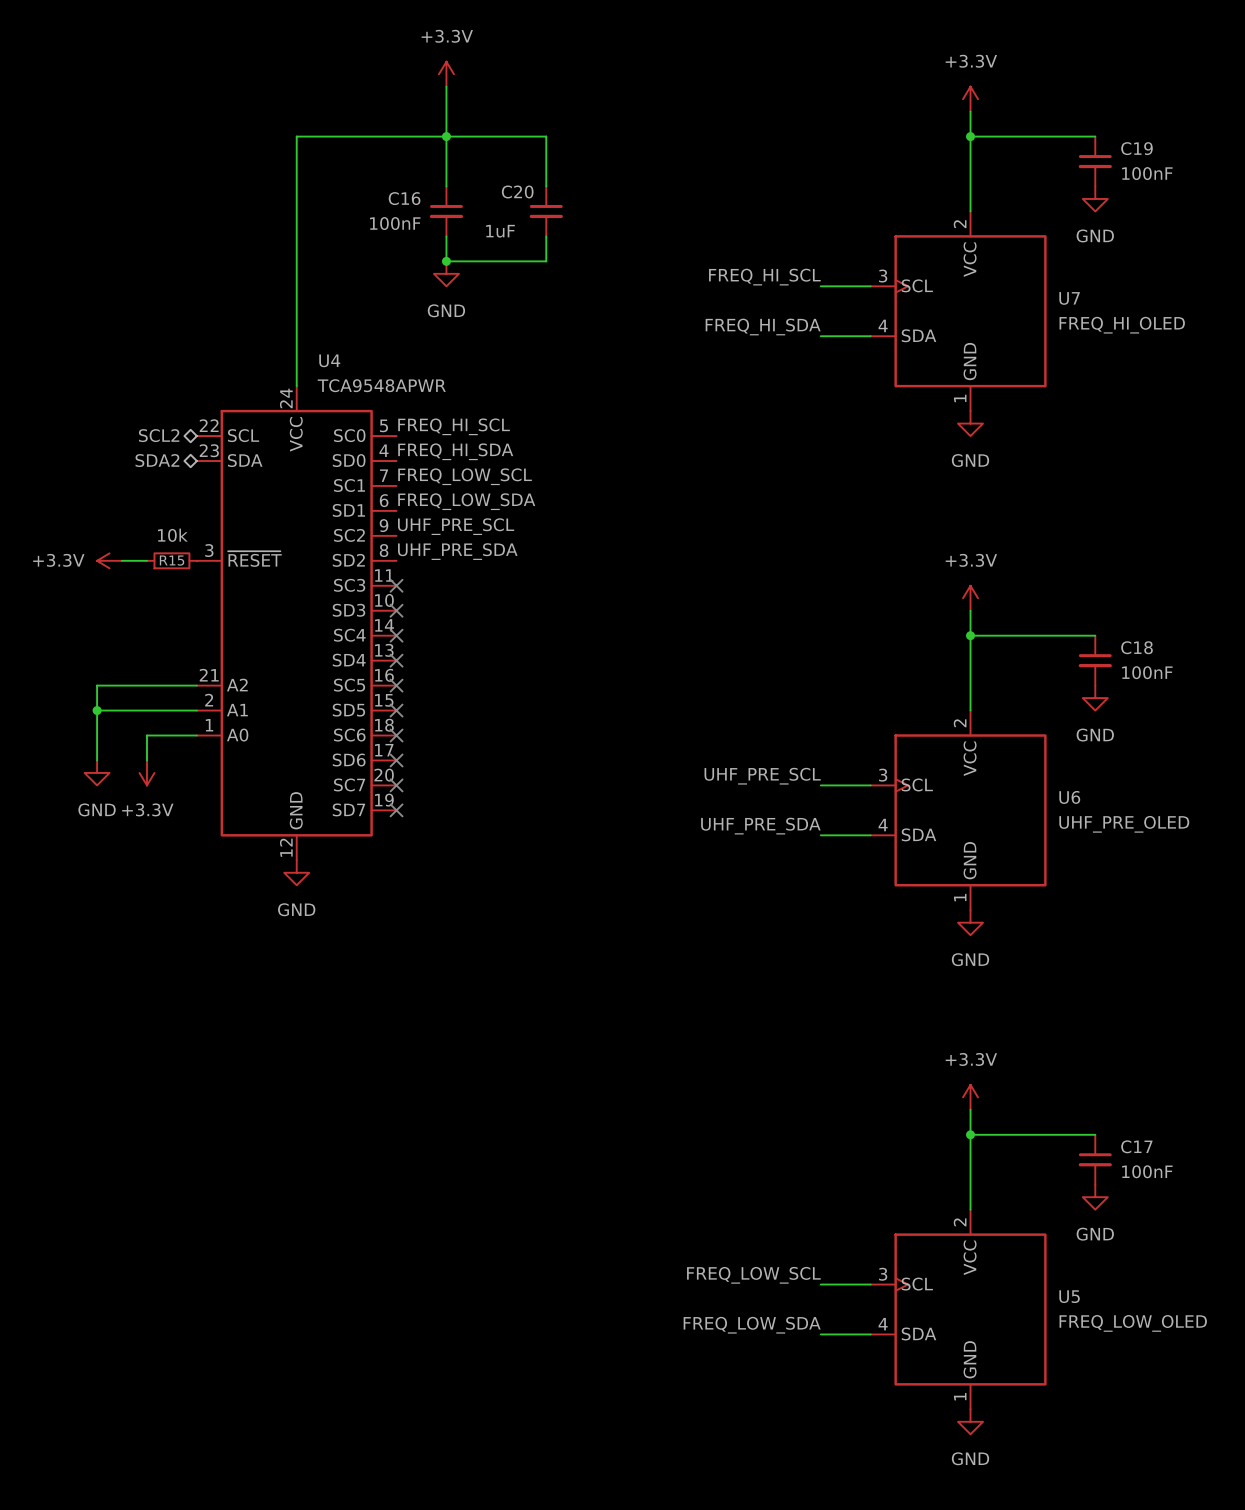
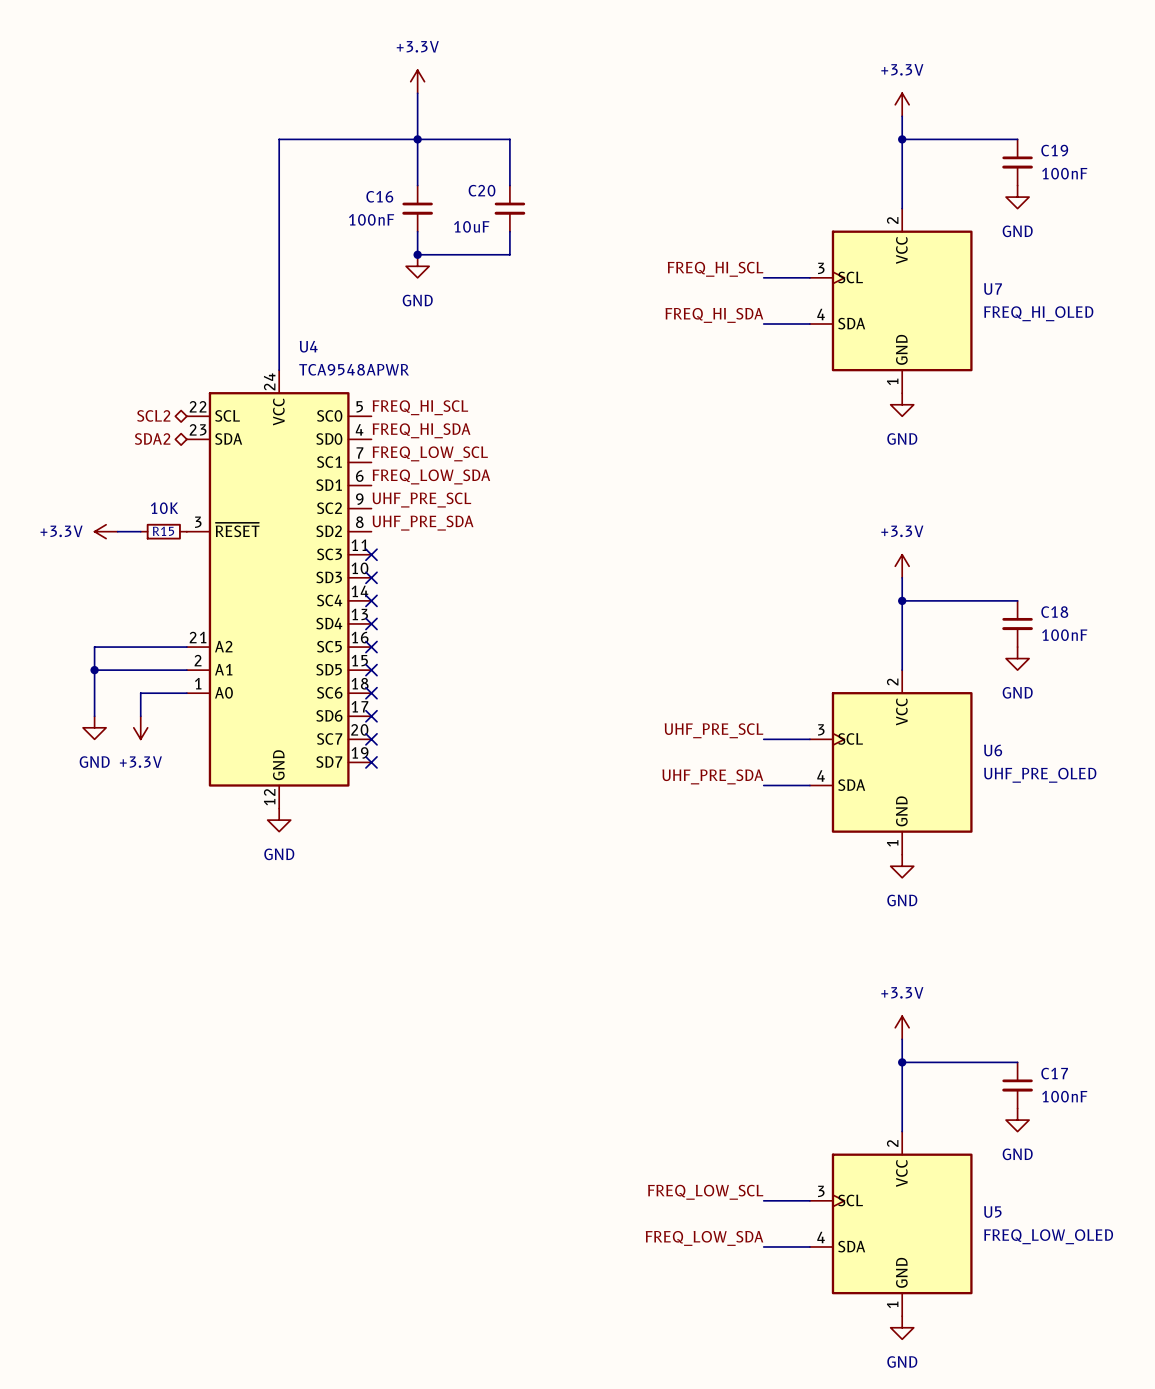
C20 value: 1uF (500, 231) -> 10uF (471, 226)
R15 value: 10k (172, 535) -> 10K (164, 508)

